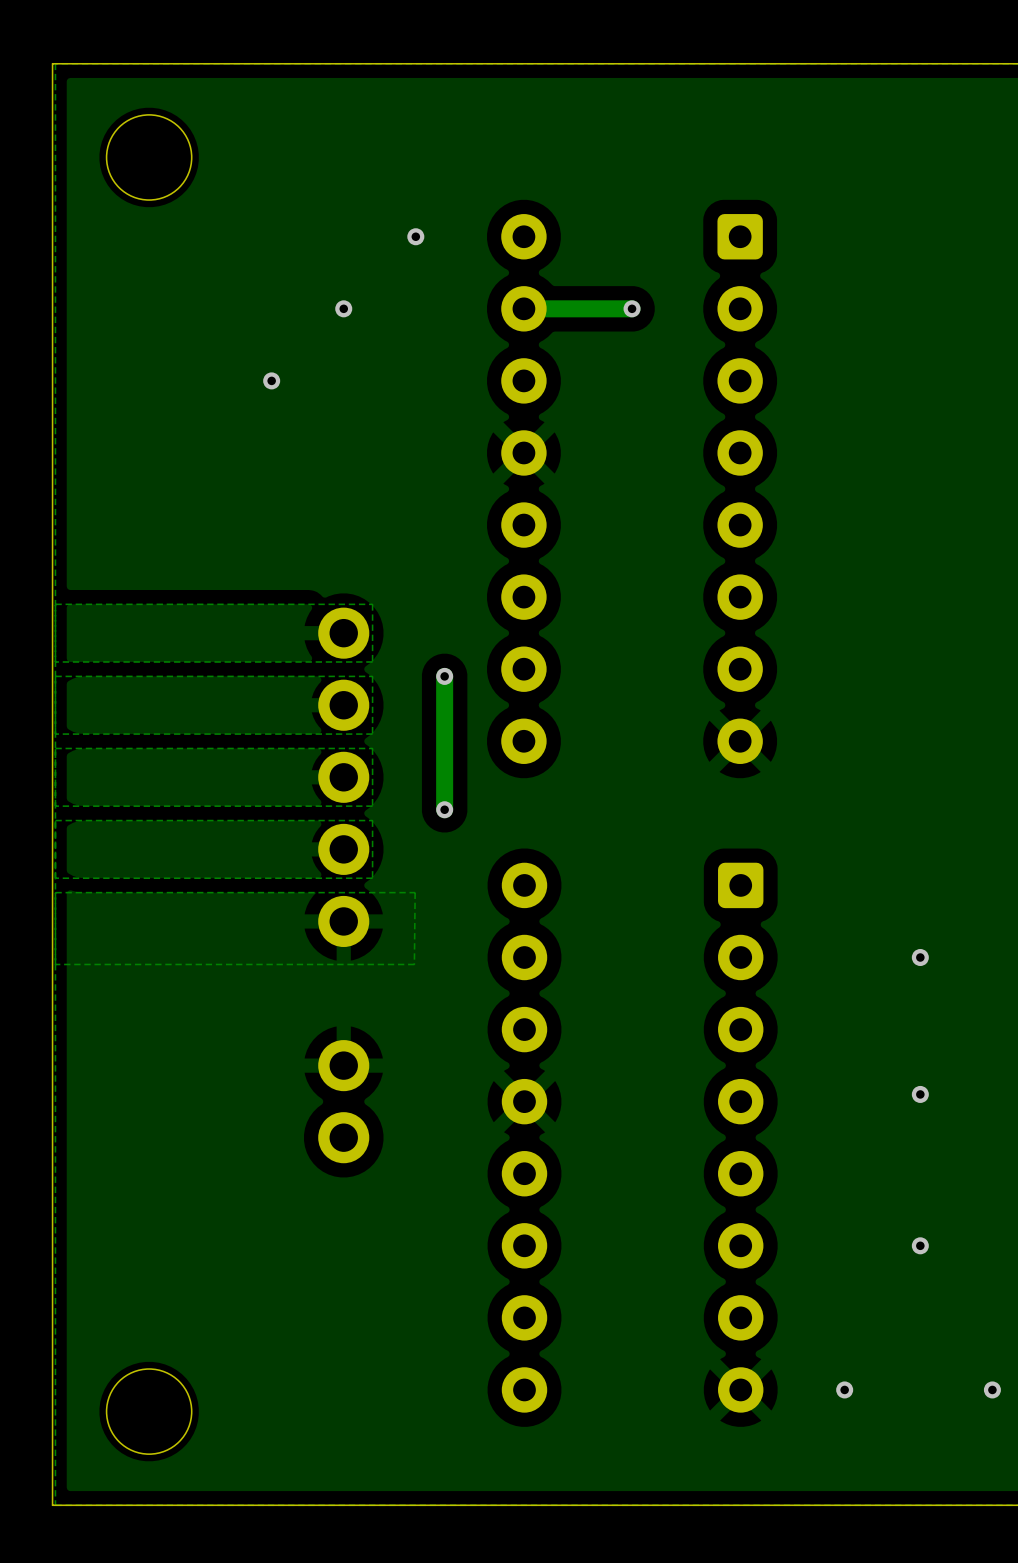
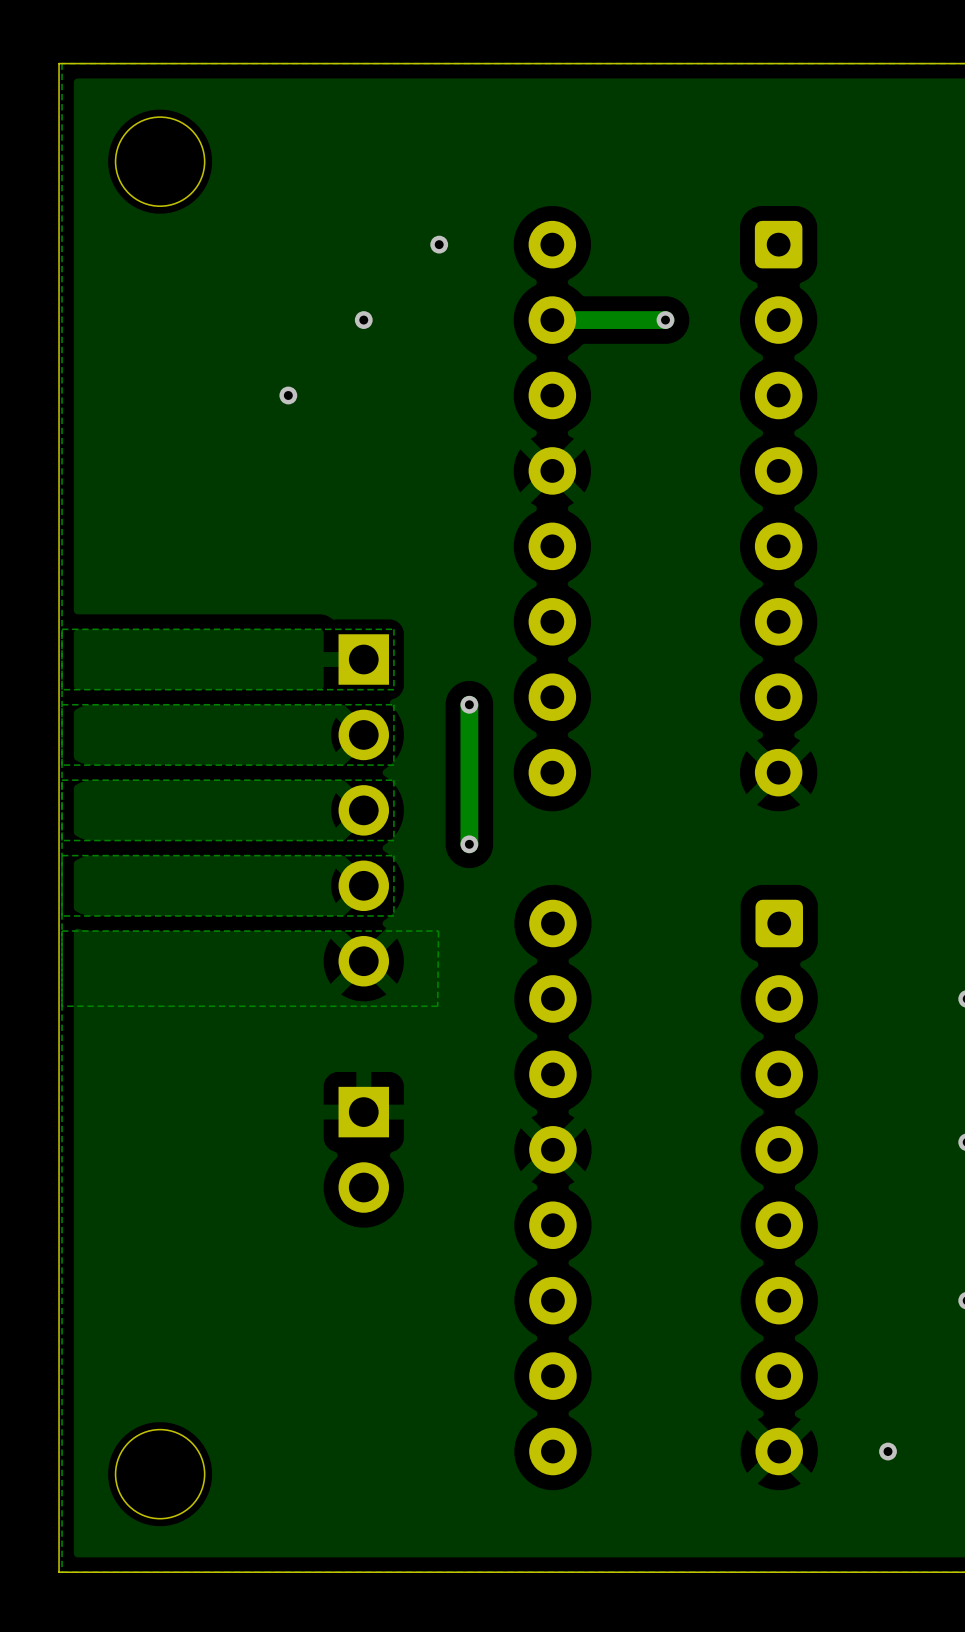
part footprint: [318, 607, 370, 948] -> [338, 634, 390, 987]
part footprint: [318, 1040, 370, 1164] -> [338, 1086, 390, 1213]

